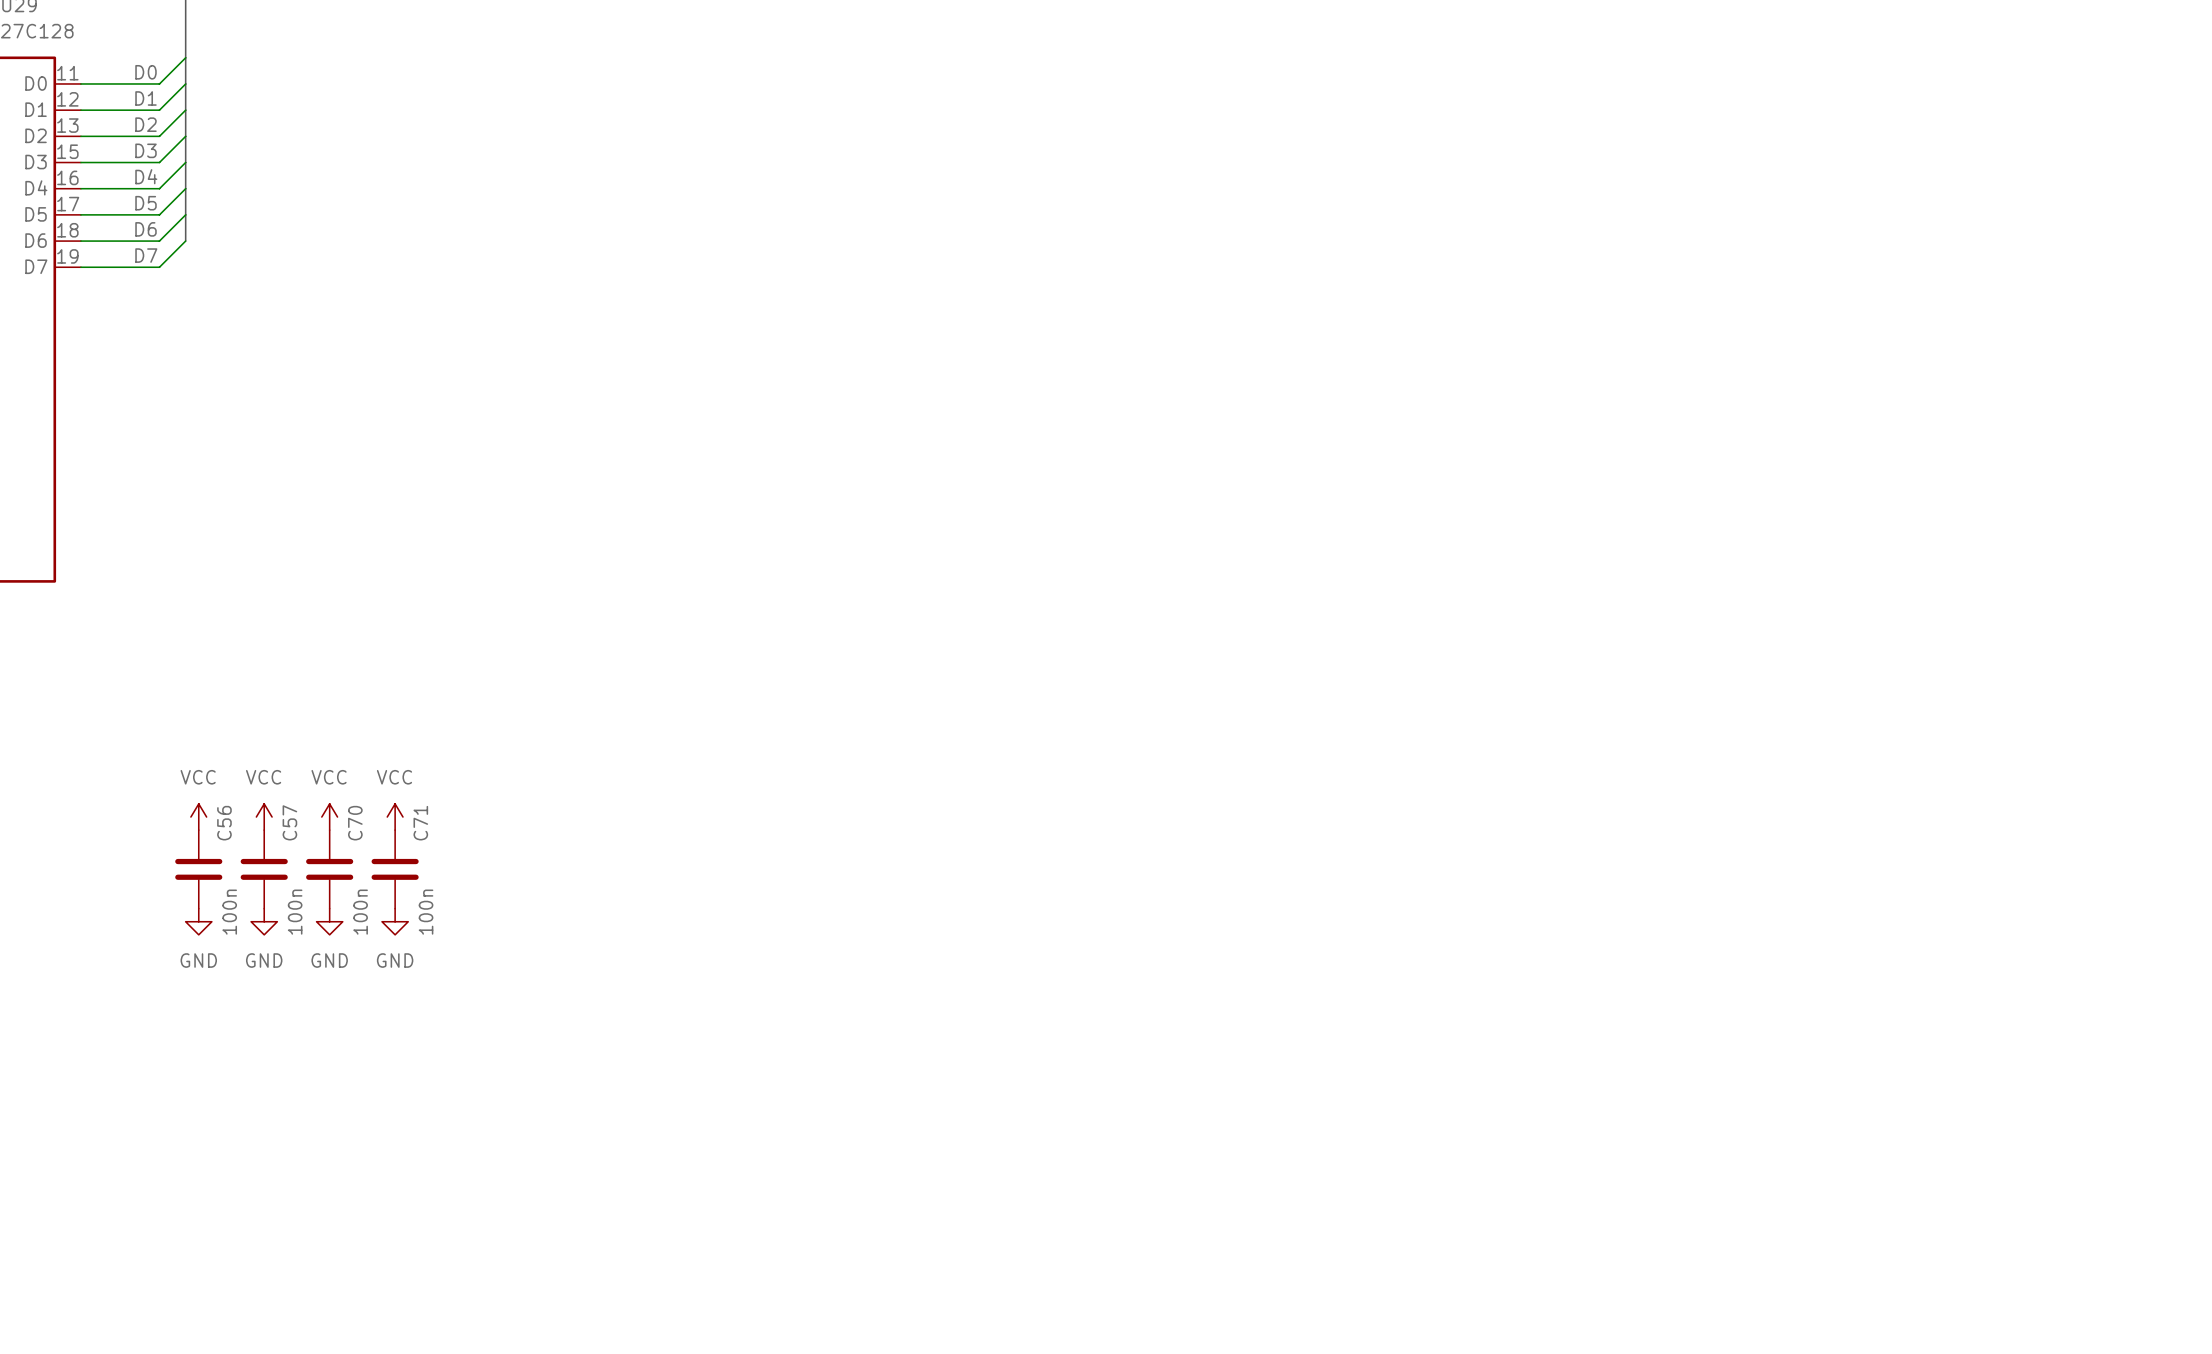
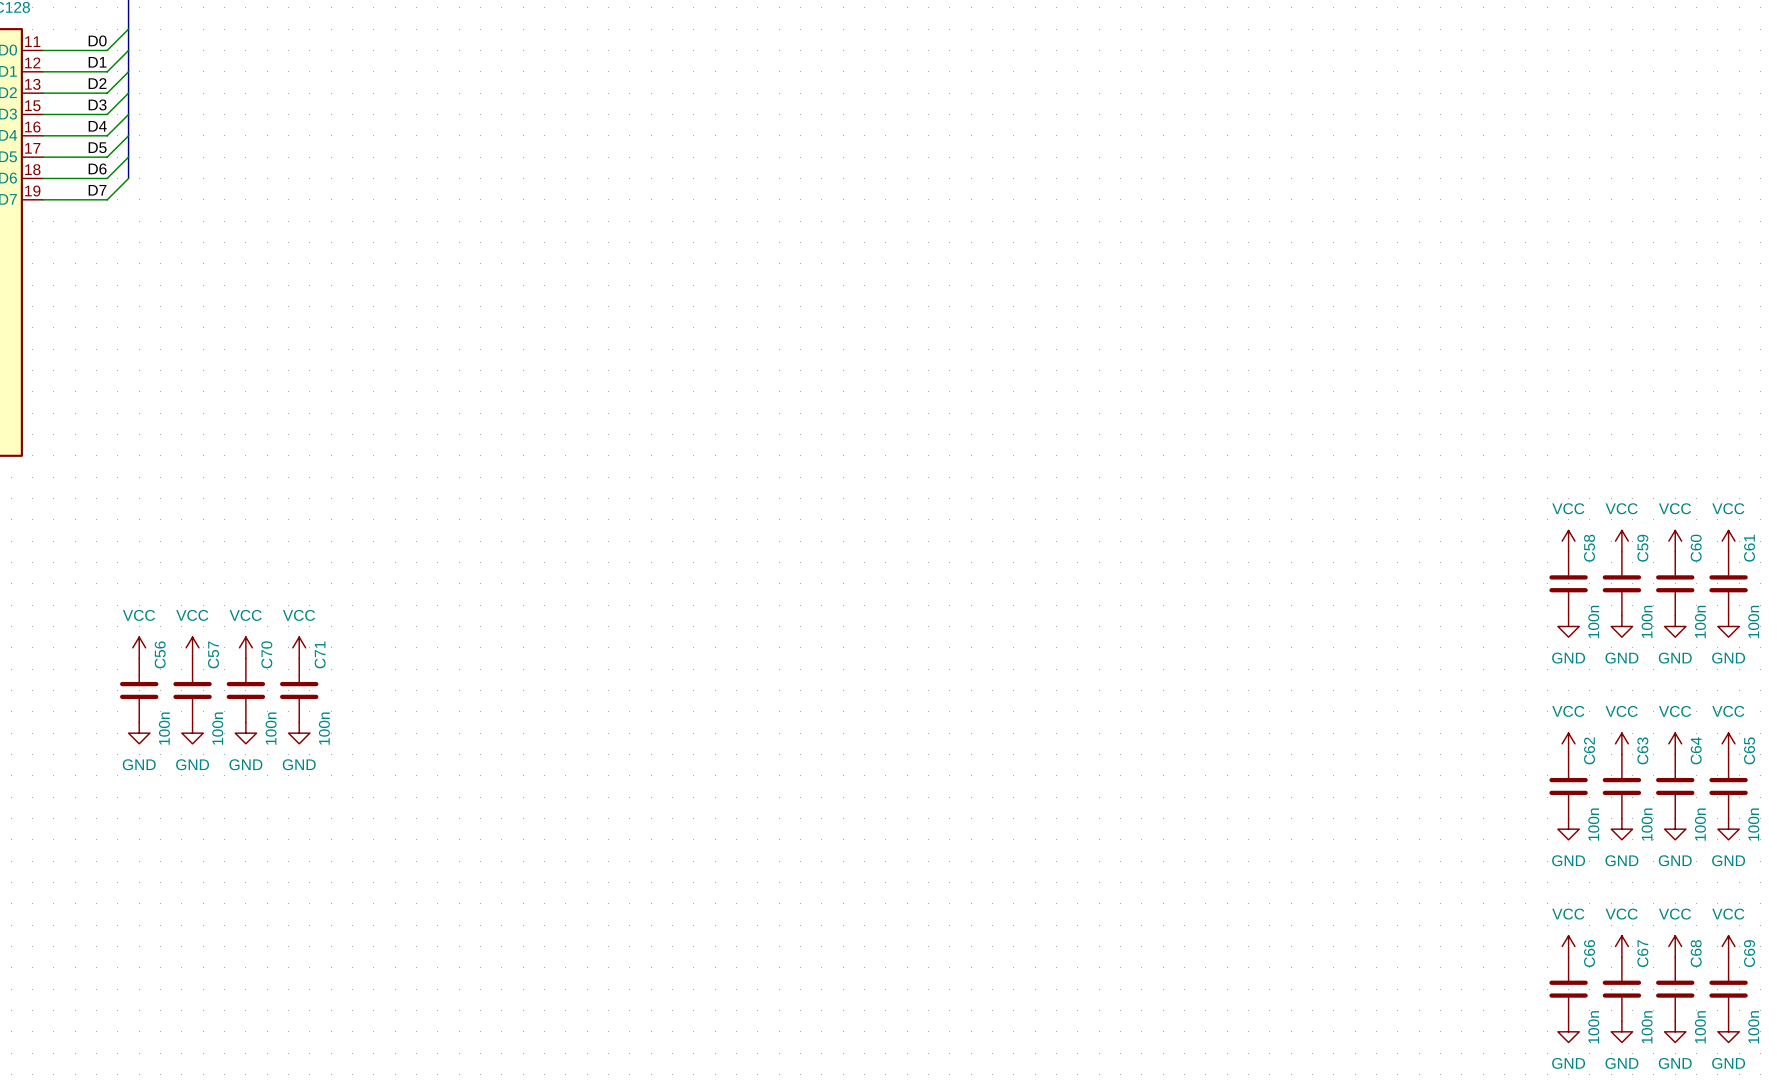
power symbol: none -> VCC (1568, 541)
power symbol: none -> VCC (1621, 541)
power symbol: none -> VCC (1675, 541)
power symbol: none -> VCC (1728, 541)
C58: none -> 100n (1568, 583)
C59: none -> 100n (1621, 583)
C60: none -> 100n (1675, 583)
C61: none -> 100n (1728, 583)
power symbol: none -> GND (1568, 626)
power symbol: none -> GND (1621, 626)
power symbol: none -> GND (1675, 626)
power symbol: none -> GND (1728, 626)
power symbol: none -> VCC (1568, 743)
power symbol: none -> VCC (1621, 743)
power symbol: none -> VCC (1675, 743)
power symbol: none -> VCC (1728, 743)
C62: none -> 100n (1568, 786)
C63: none -> 100n (1621, 786)
C64: none -> 100n (1675, 786)
C65: none -> 100n (1728, 786)
power symbol: none -> GND (1568, 829)
power symbol: none -> GND (1621, 829)
power symbol: none -> GND (1675, 829)
power symbol: none -> GND (1728, 829)
power symbol: none -> VCC (1568, 946)
power symbol: none -> VCC (1621, 946)
power symbol: none -> VCC (1675, 946)
power symbol: none -> VCC (1728, 946)
C66: none -> 100n (1568, 989)
C67: none -> 100n (1621, 989)
C68: none -> 100n (1675, 989)
C69: none -> 100n (1728, 989)
power symbol: none -> GND (1568, 1031)
power symbol: none -> GND (1621, 1031)
power symbol: none -> GND (1675, 1031)
power symbol: none -> GND (1728, 1031)

